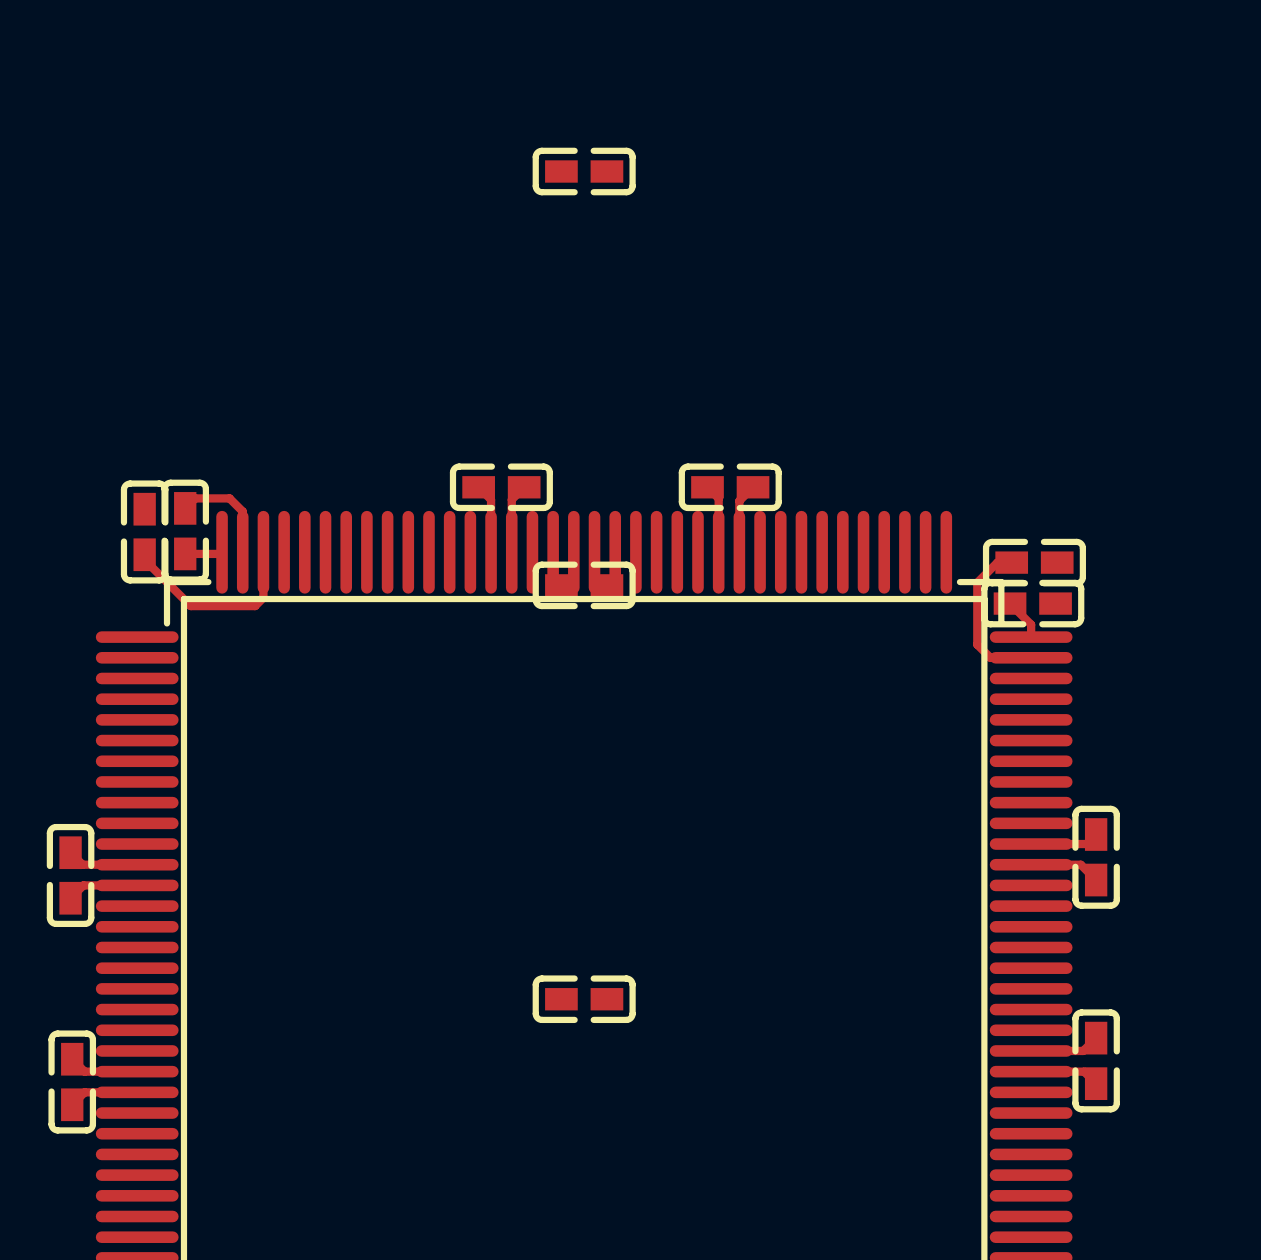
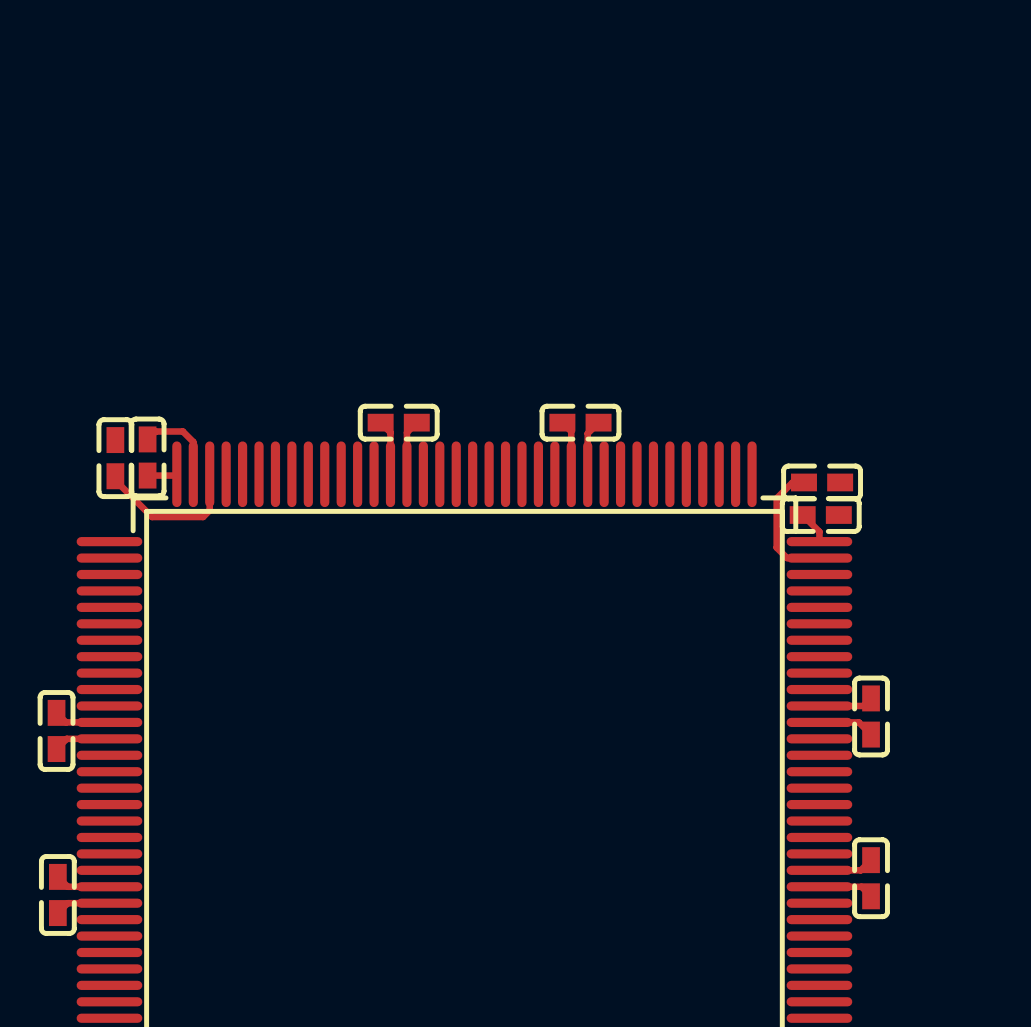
part: (584, 171) -> none
part: (584, 585) -> none
part: (584, 999) -> none

